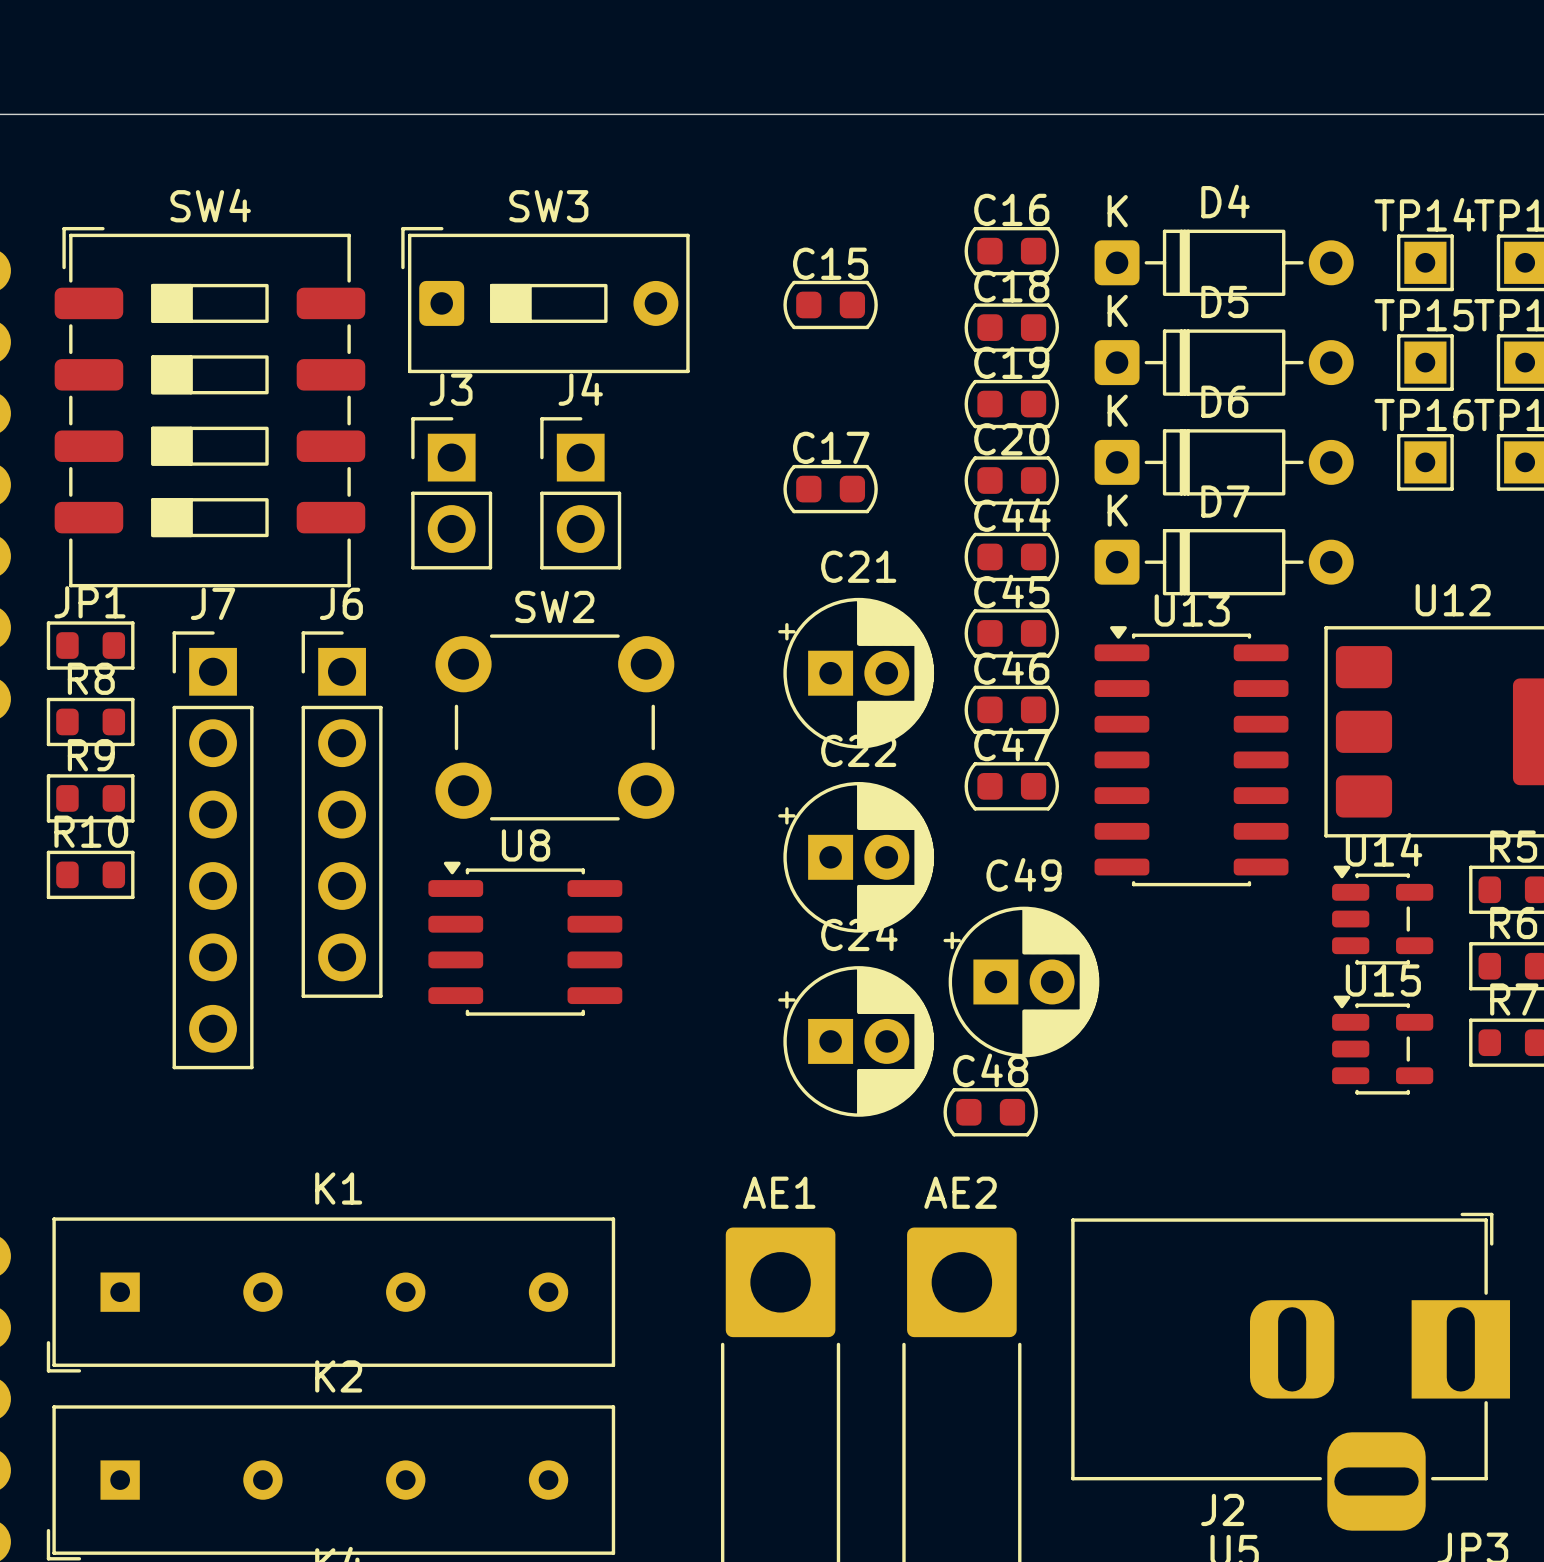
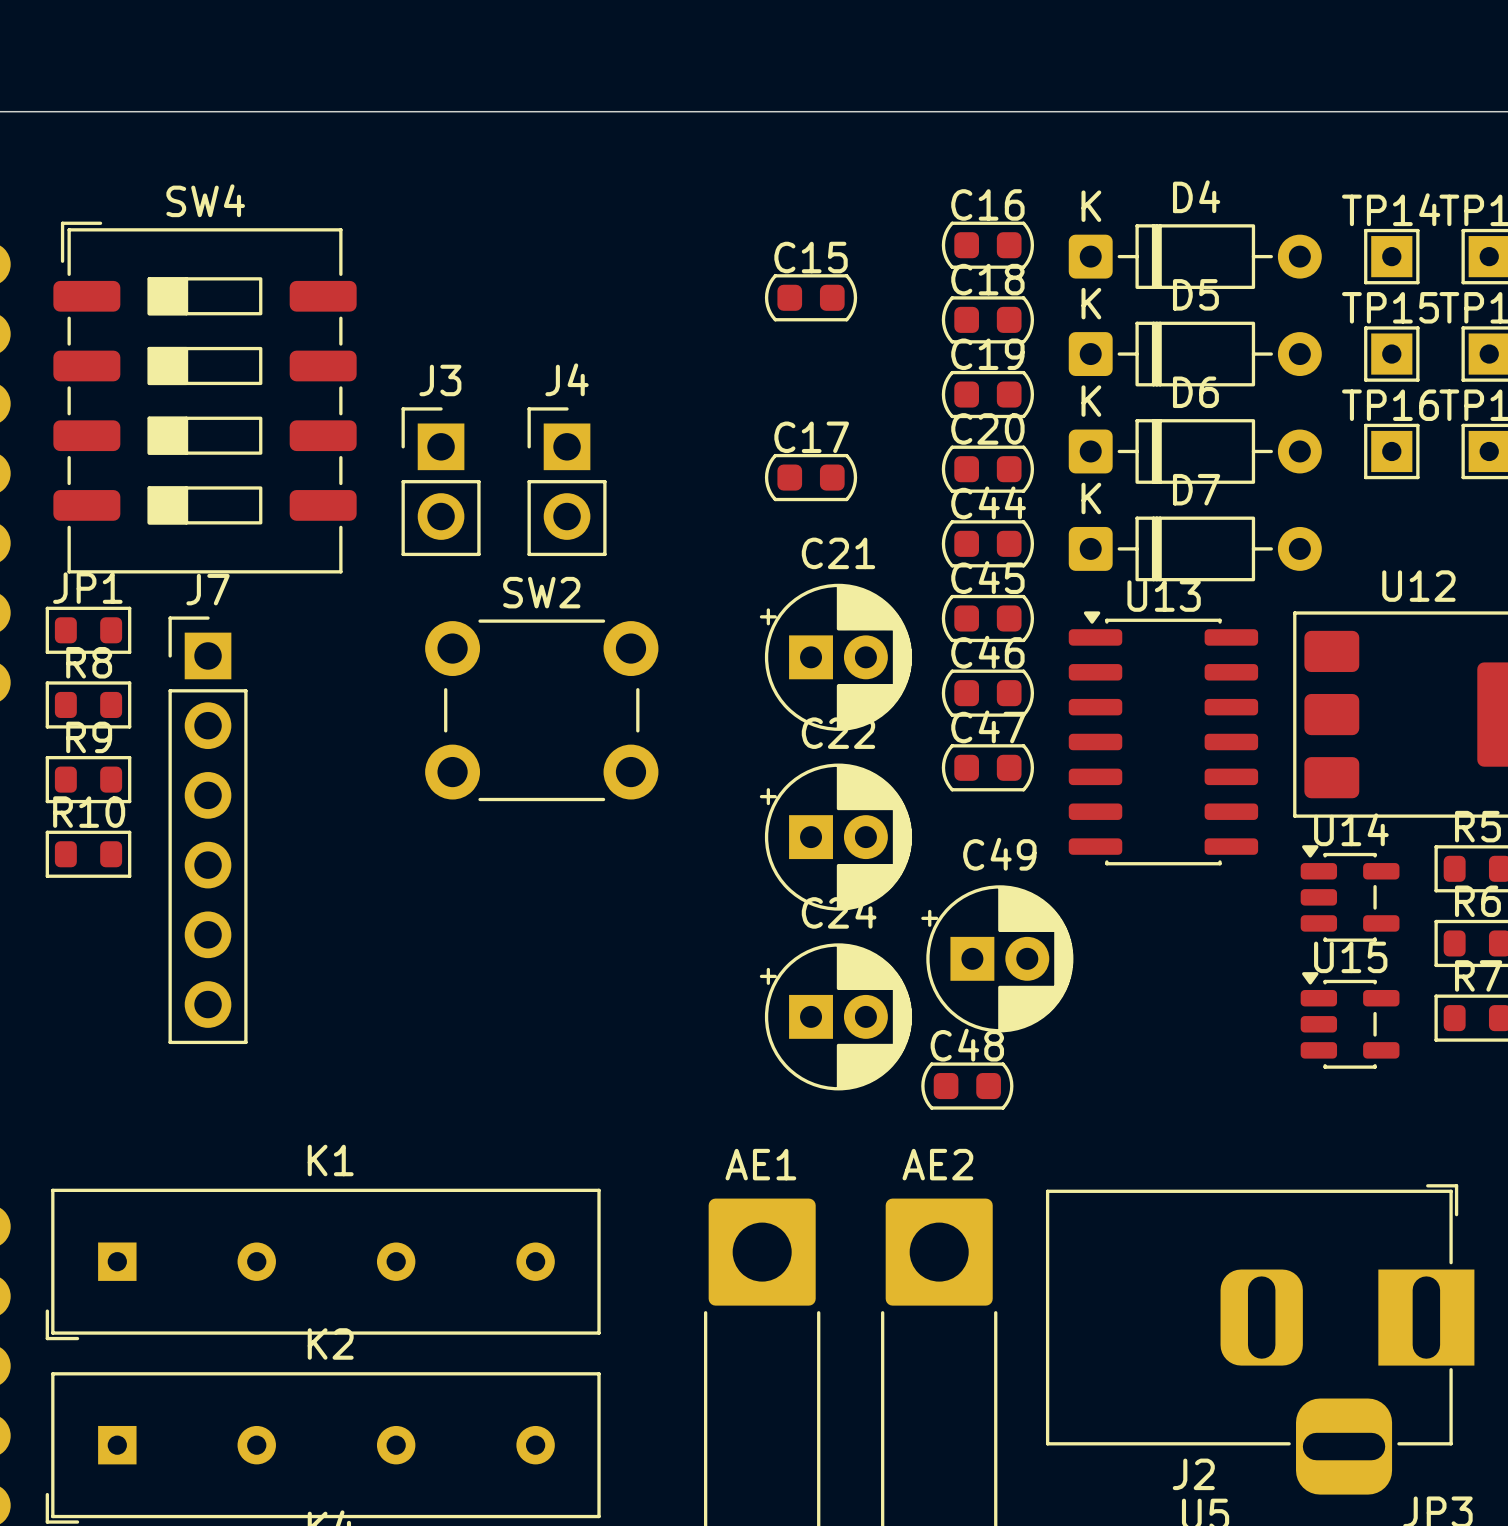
SW3: (545, 300) -> none
J6: (342, 814) -> none
U8: (525, 938) -> none

